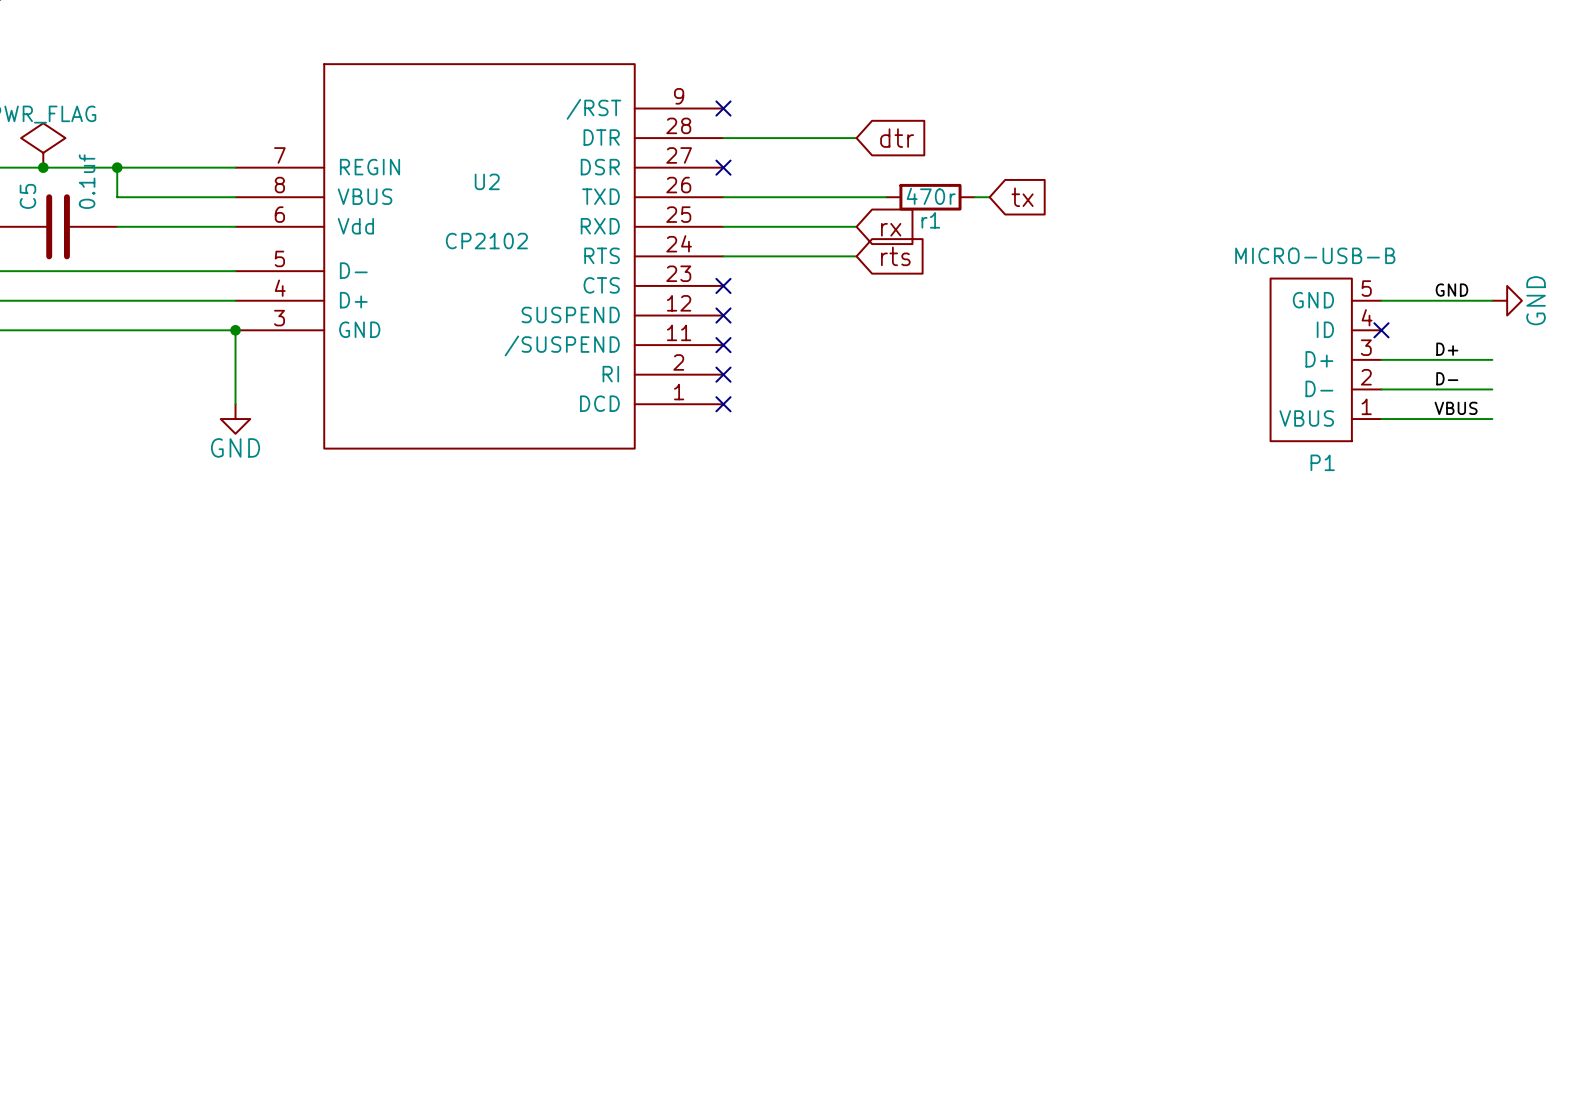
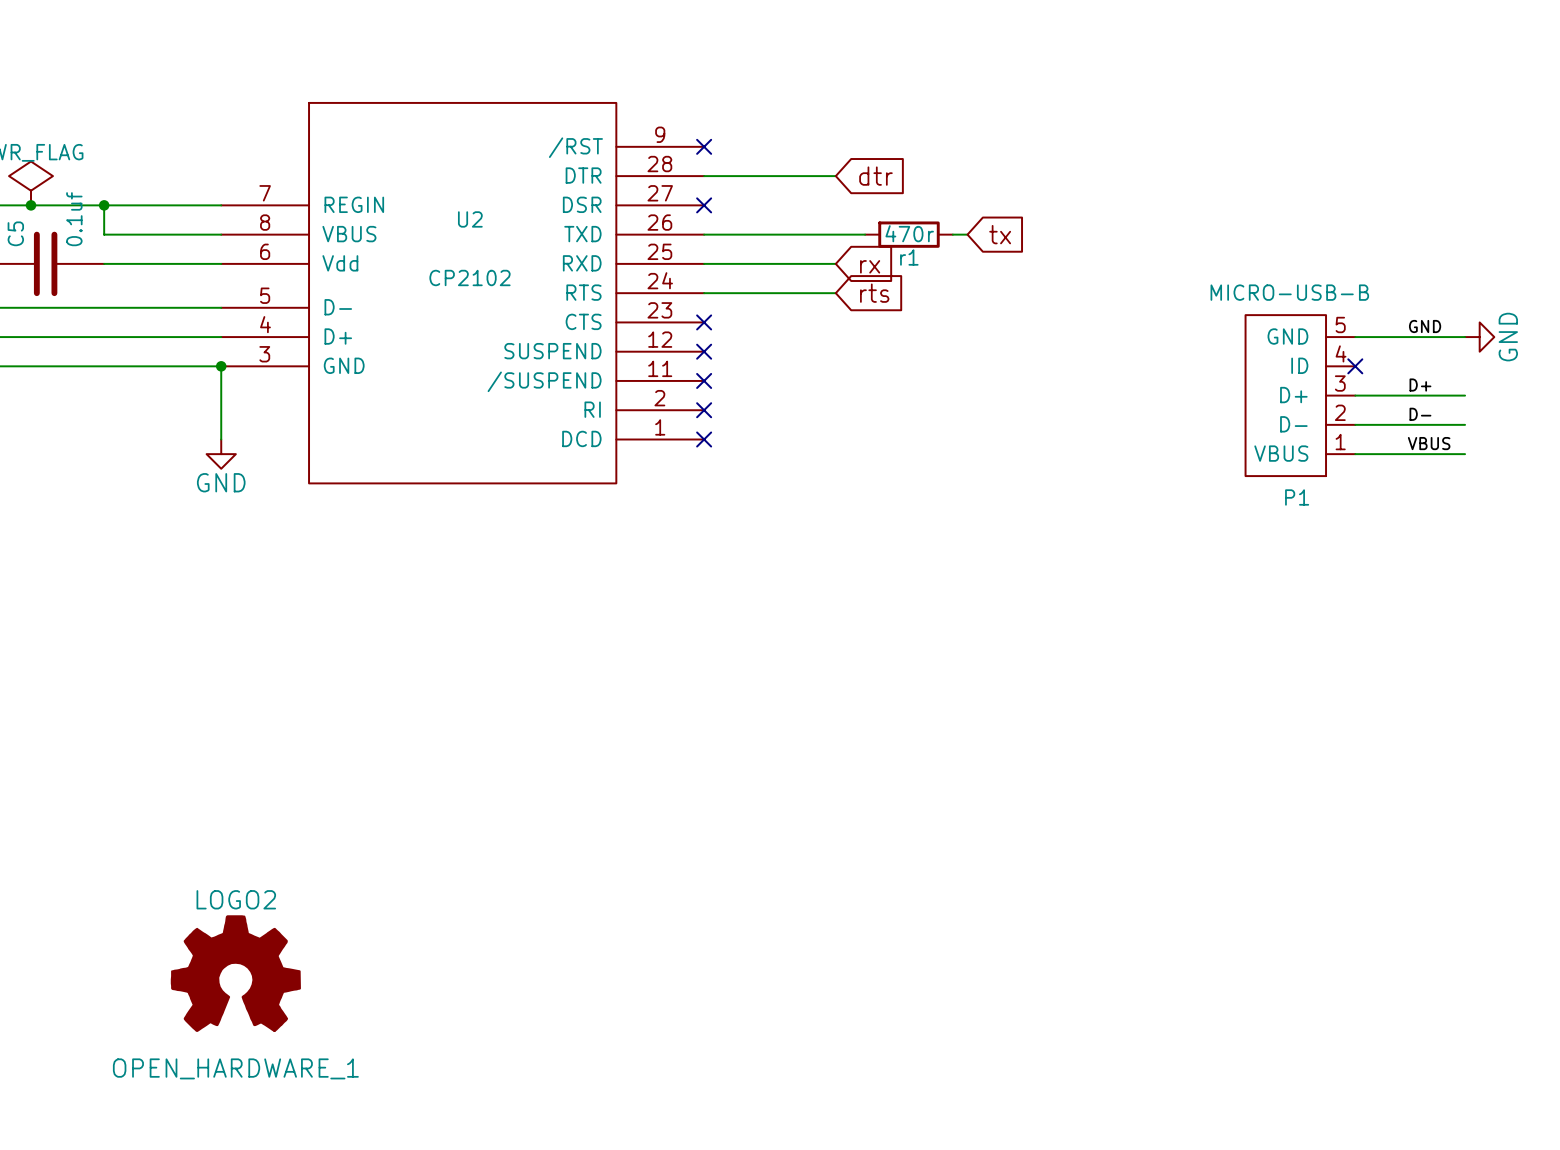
LOGO2: none -> OPEN_HARDWARE_1 (235, 973)

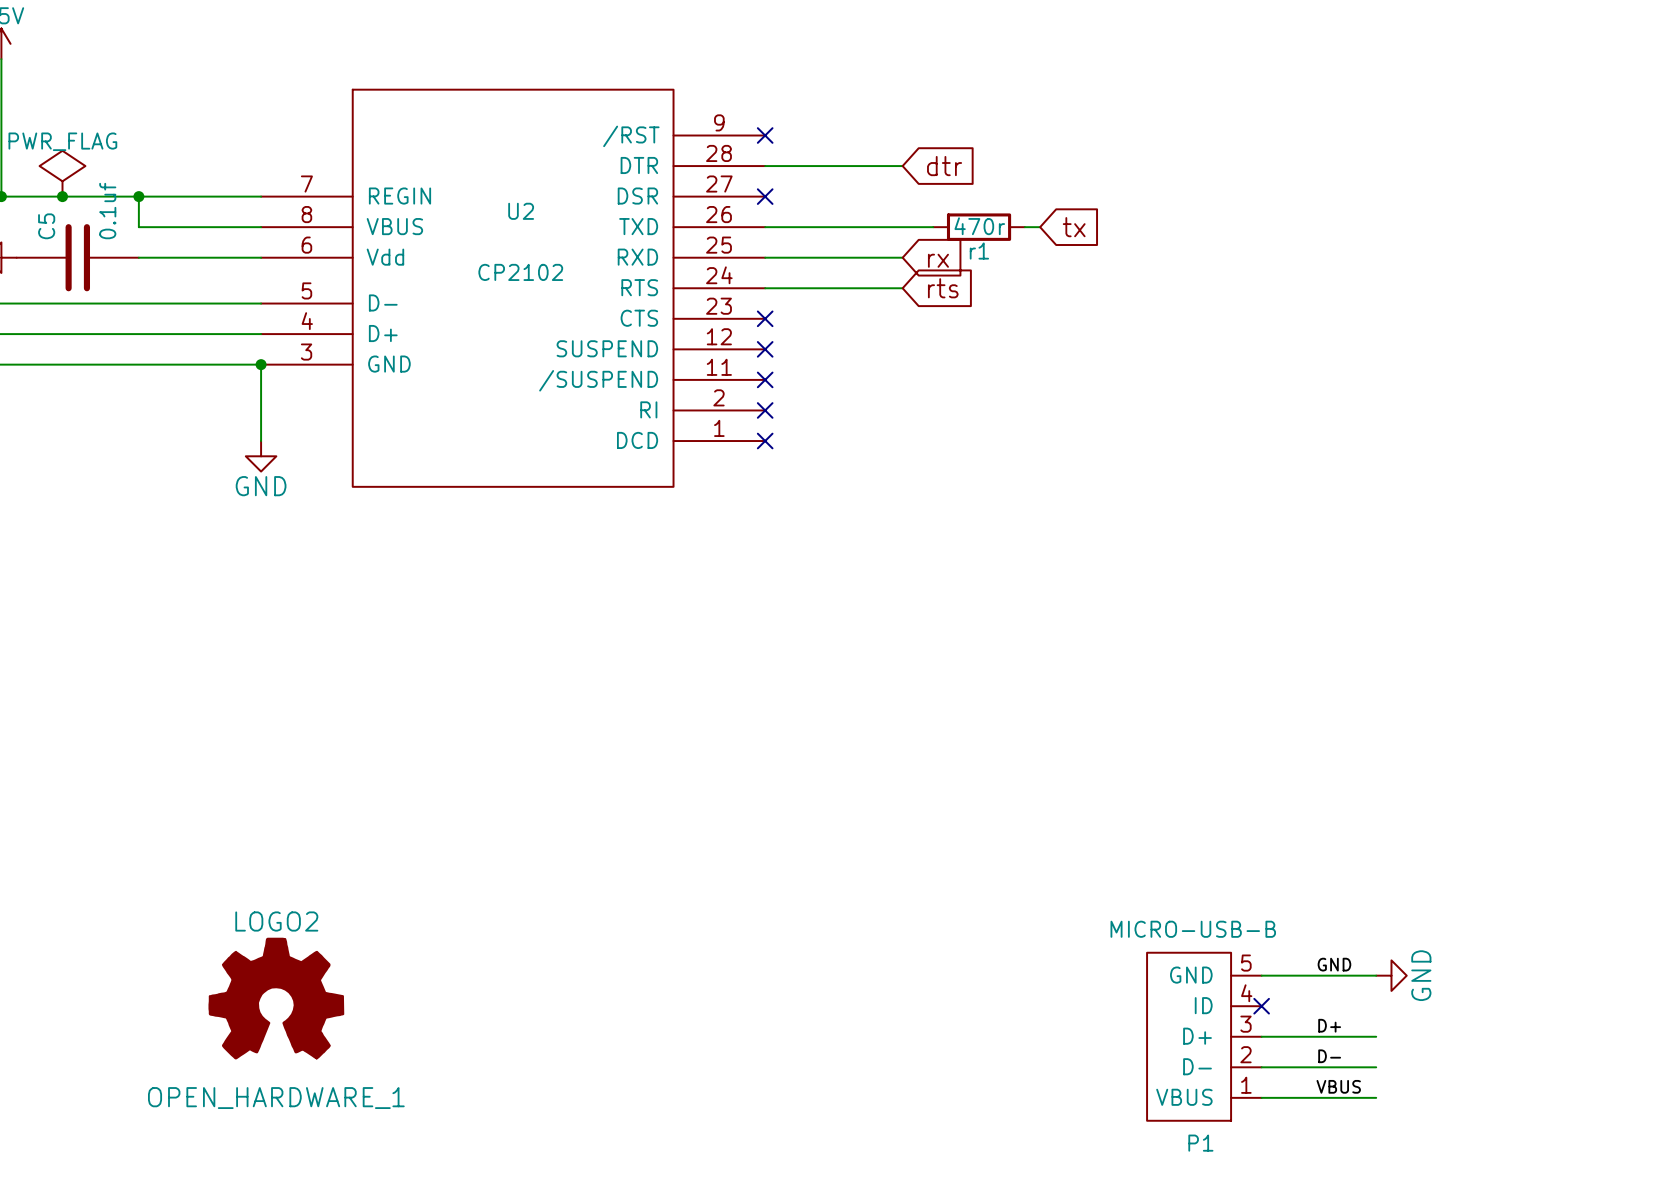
label: GND (1425, 326) -> none
wire: (1355, 337) (1465, 337) -> none
power symbol: GND (1479, 337) -> none
no-connect mark: (1355, 366) -> none
label: D+ (1420, 385) -> none
P1 position: (1300, 395) -> (1204, 1036)
wire: (1355, 395) (1465, 395) -> none
label: D- (1420, 414) -> none
wire: (1355, 424) (1465, 424) -> none
label: VBUS (1429, 443) -> none
wire: (1355, 454) (1465, 454) -> none
label: none -> GND (1334, 964)
wire: none -> (1261, 975) (1376, 975)
power symbol: none -> GND (1391, 975)
no-connect mark: none -> (1261, 1006)
label: none -> D+ (1329, 1025)
wire: none -> (1261, 1036) (1376, 1036)
label: none -> D- (1329, 1056)
wire: none -> (1261, 1067) (1376, 1067)
label: none -> VBUS (1338, 1086)
wire: none -> (1261, 1097) (1376, 1097)

